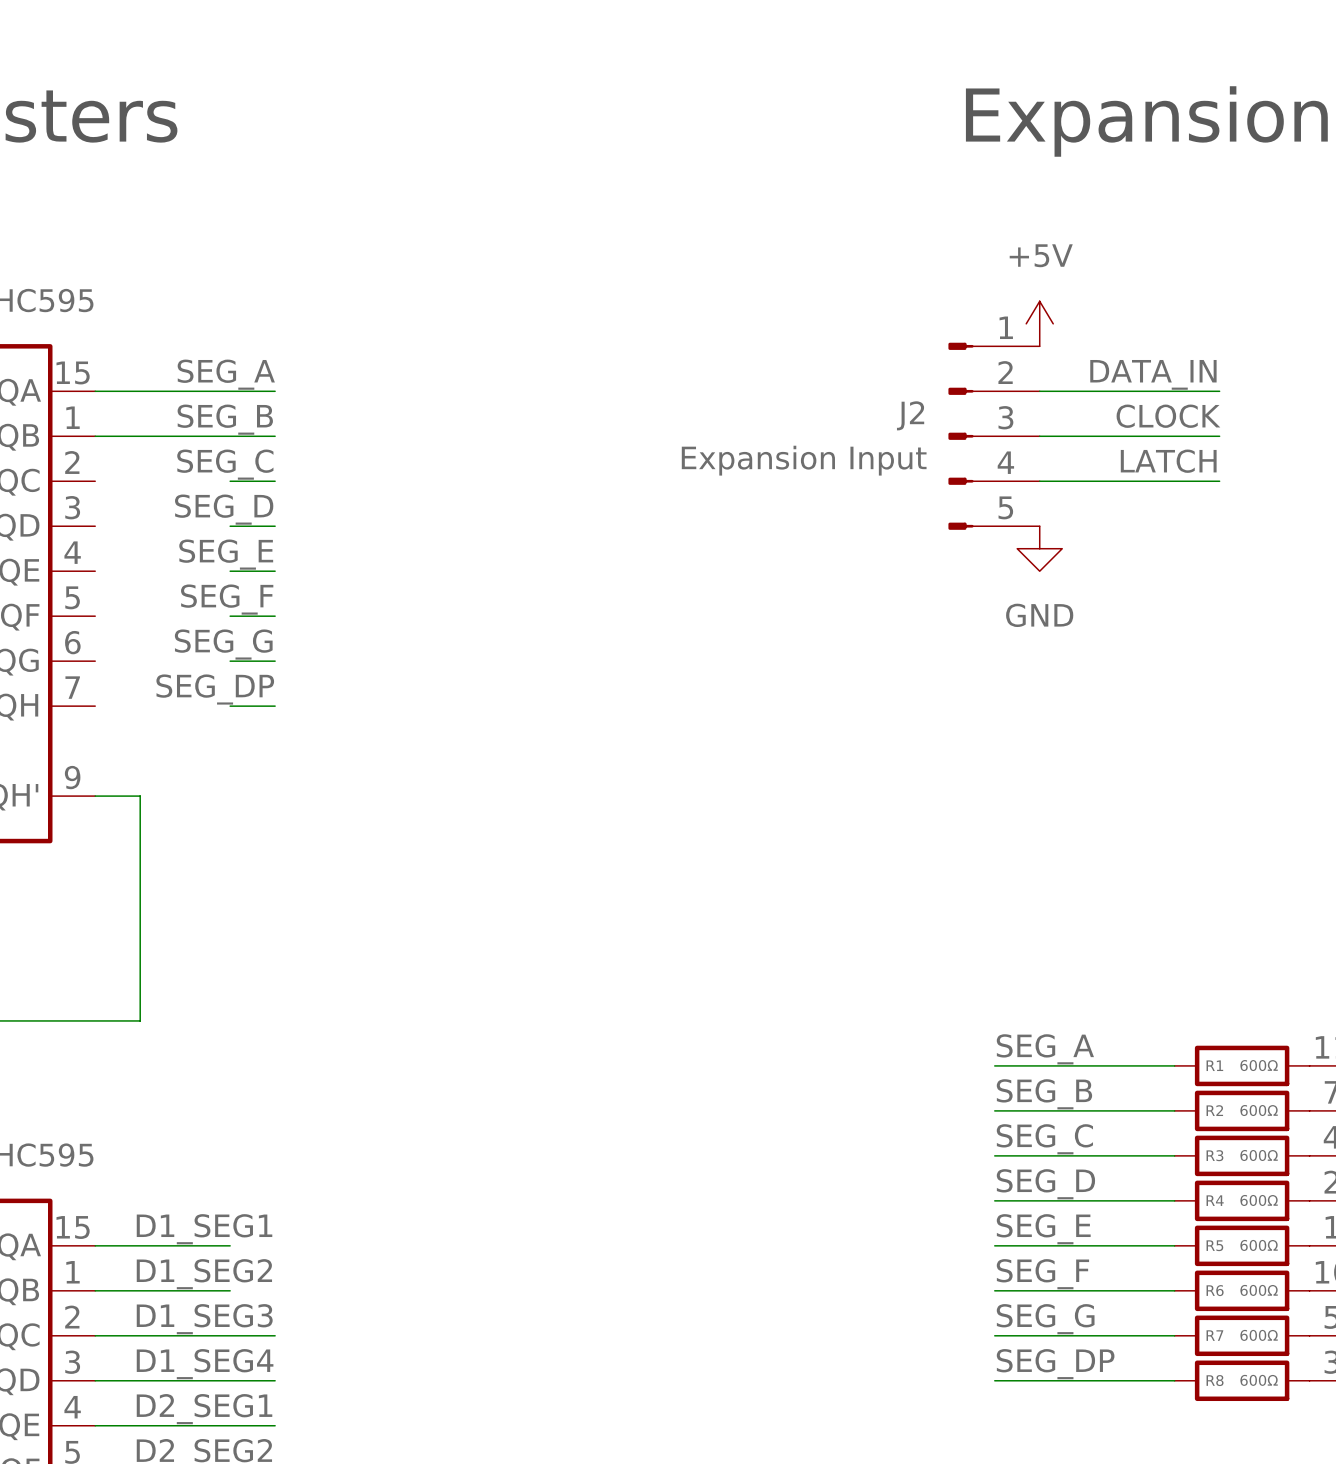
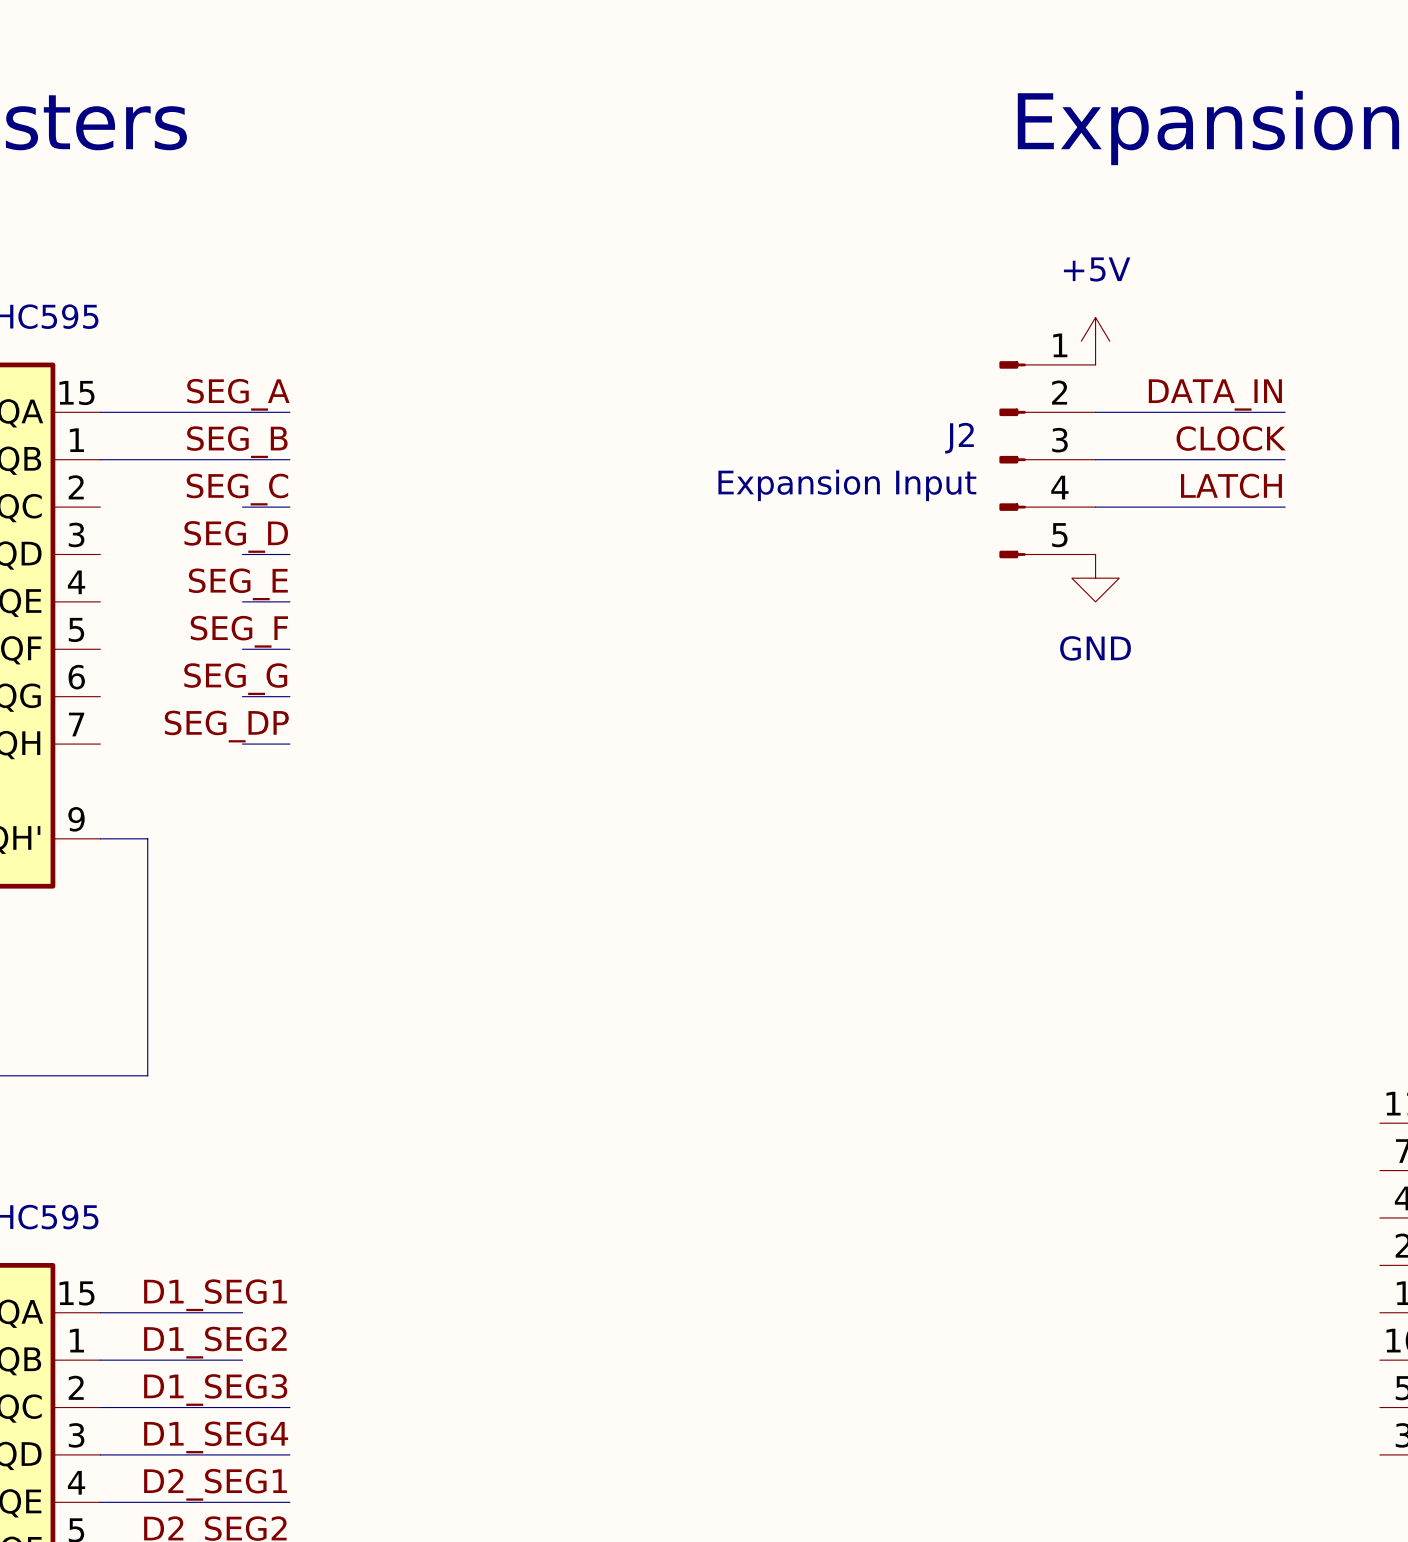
label: SEG_A (1045, 1049) -> none
wire: (994, 1065) (1174, 1065) -> none
R1: 600Ω (1242, 1065) -> none
label: SEG_B (1044, 1094) -> none
wire: (994, 1110) (1174, 1110) -> none
R2: 600Ω (1242, 1110) -> none
label: SEG_C (1044, 1139) -> none
wire: (994, 1155) (1174, 1155) -> none
R3: 600Ω (1242, 1155) -> none
label: SEG_D (1045, 1184) -> none
wire: (994, 1200) (1174, 1200) -> none
R4: 600Ω (1242, 1200) -> none
label: SEG_E (1043, 1229) -> none
wire: (994, 1245) (1174, 1245) -> none
R5: 600Ω (1242, 1245) -> none
label: SEG_F (1042, 1274) -> none
wire: (994, 1290) (1174, 1290) -> none
R6: 600Ω (1242, 1290) -> none
label: SEG_G (1045, 1319) -> none
wire: (994, 1335) (1174, 1335) -> none
R7: 600Ω (1242, 1335) -> none
label: SEG_DP (1055, 1364) -> none
wire: (994, 1380) (1174, 1380) -> none
R8: 600Ω (1242, 1380) -> none

